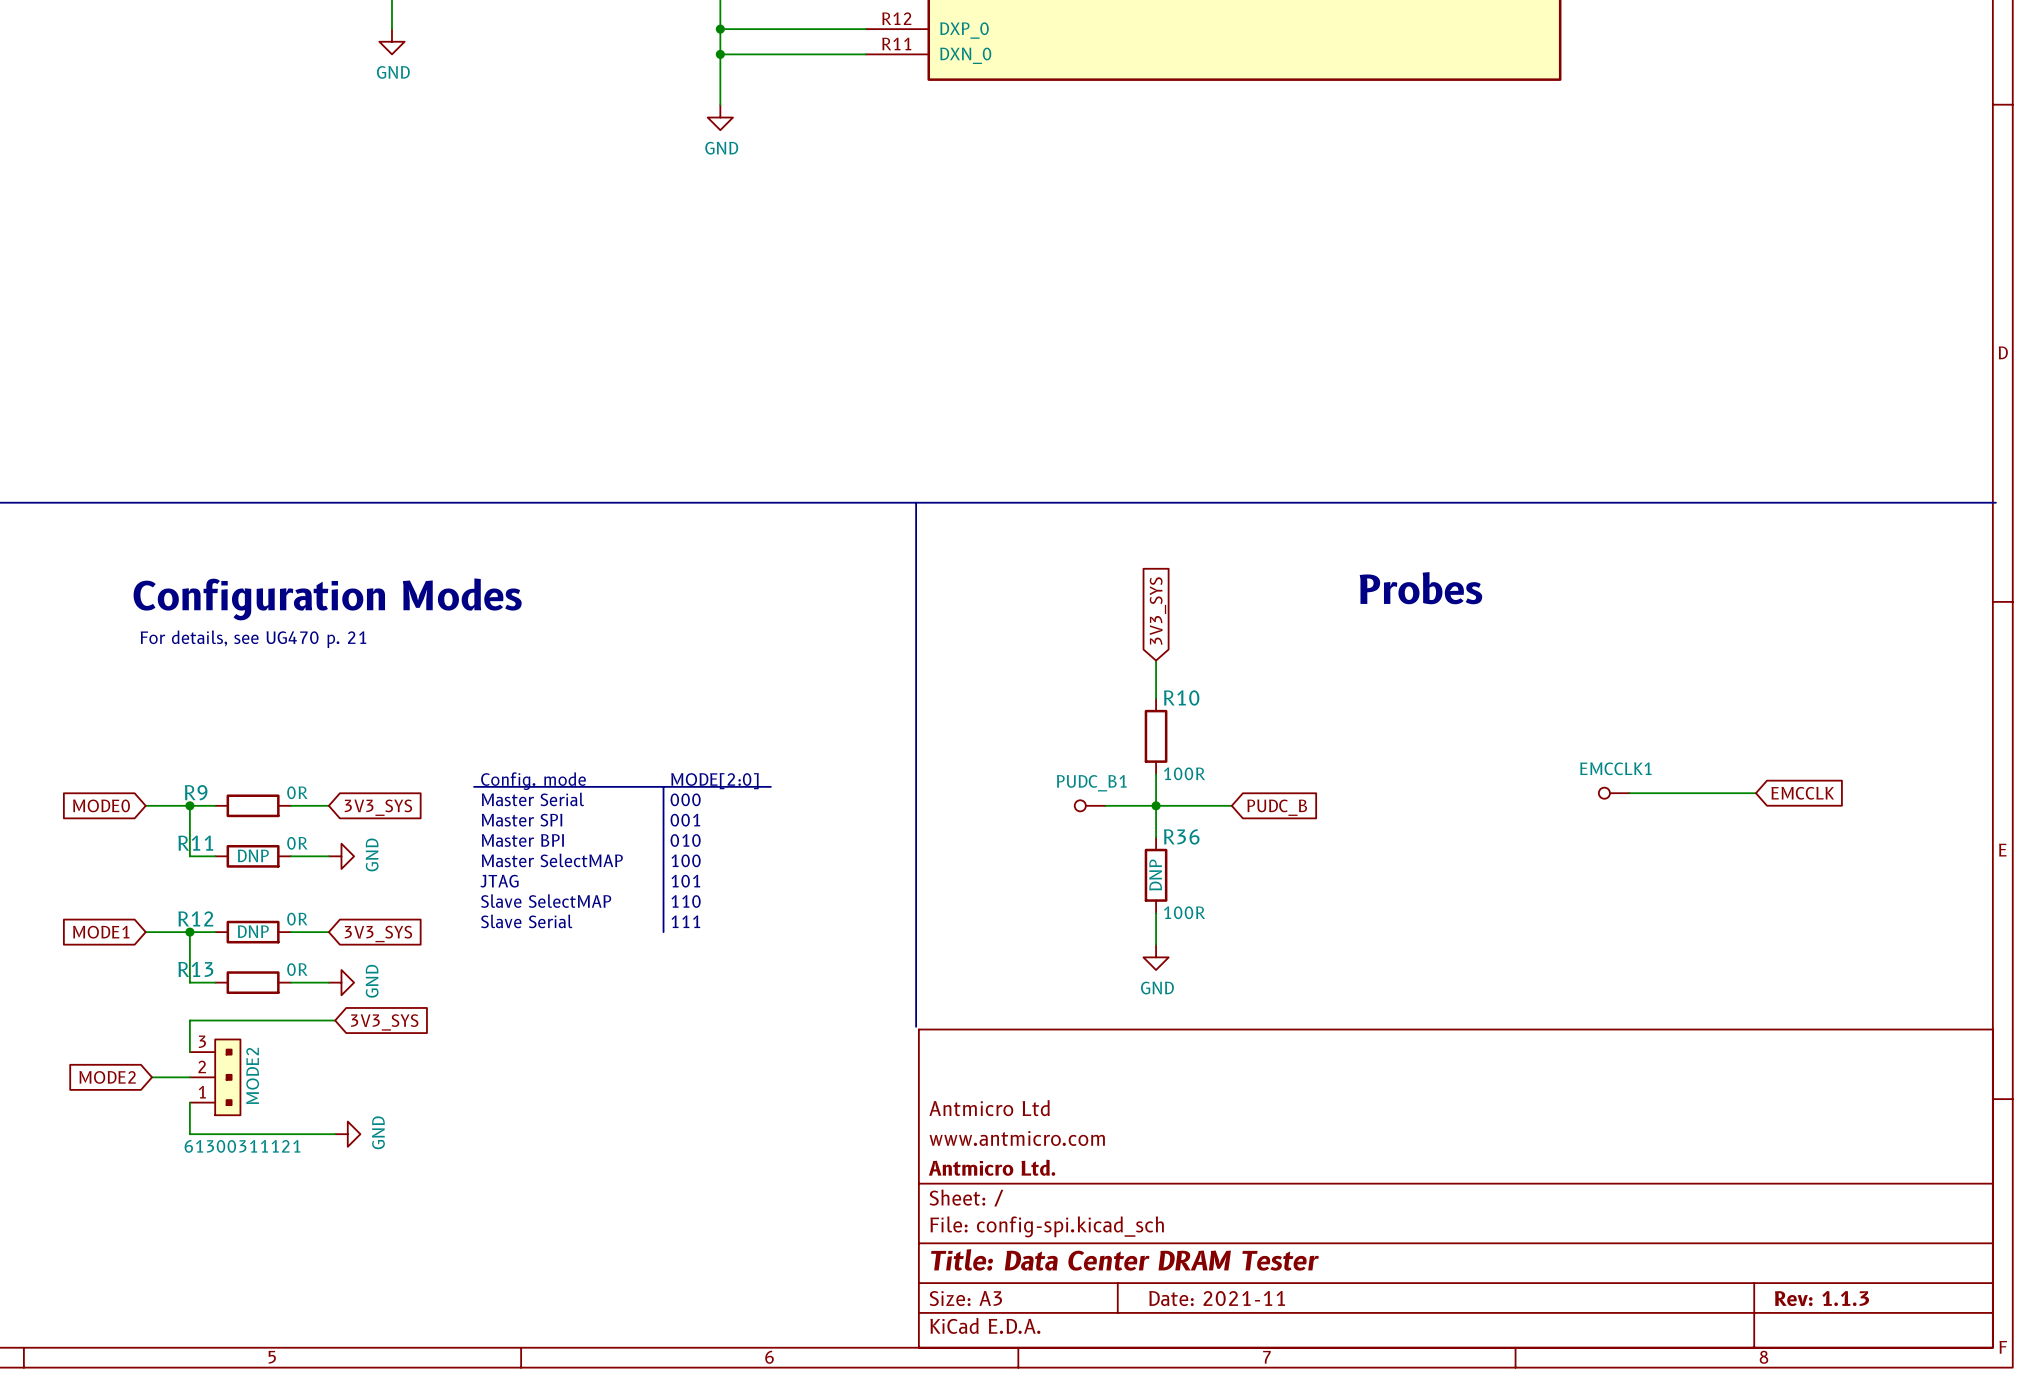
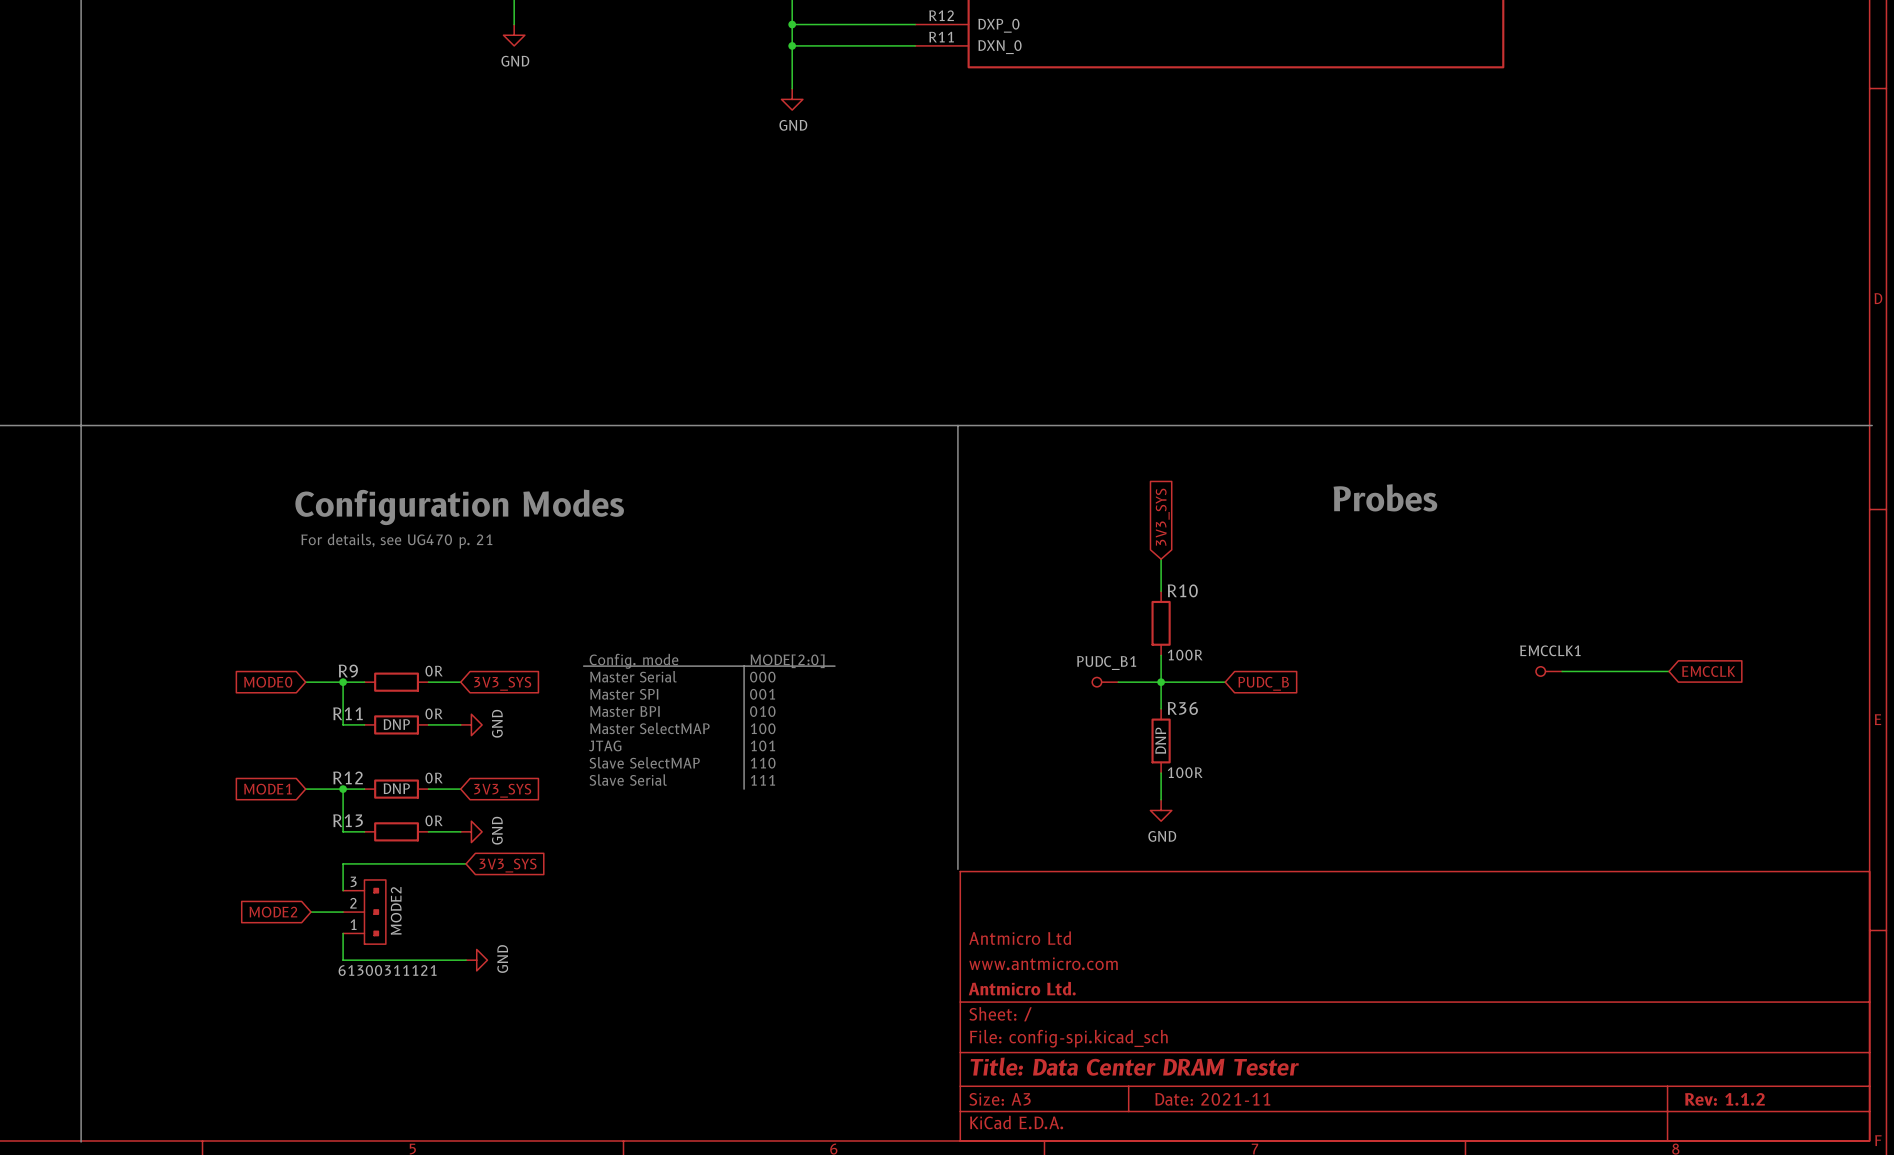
title block: Rev: 1.1.3 (1821, 1298) -> Rev: 1.1.2 (1724, 1099)

